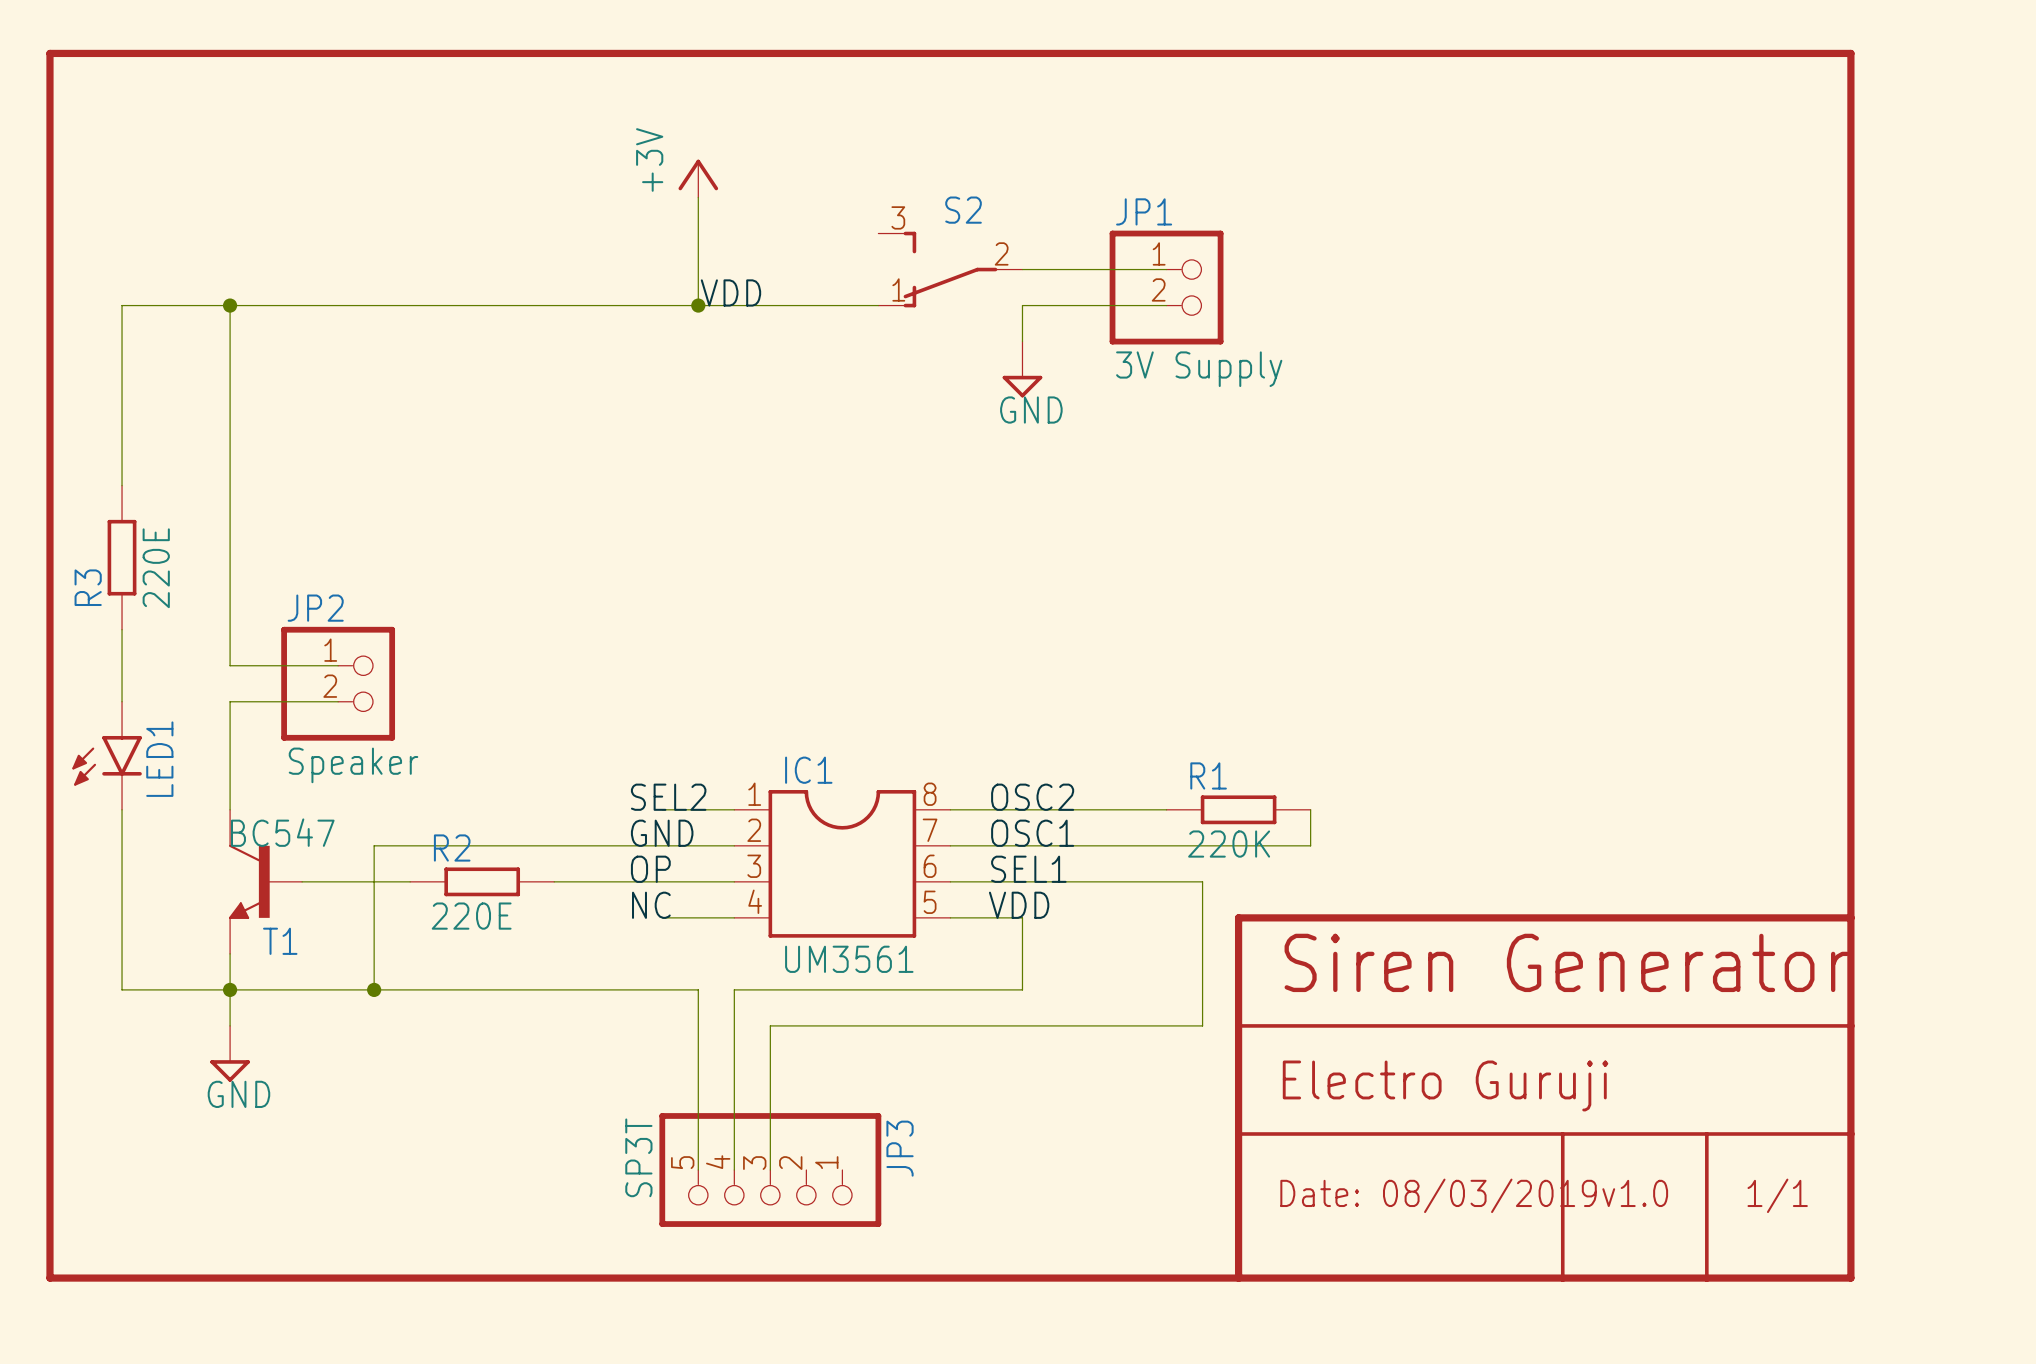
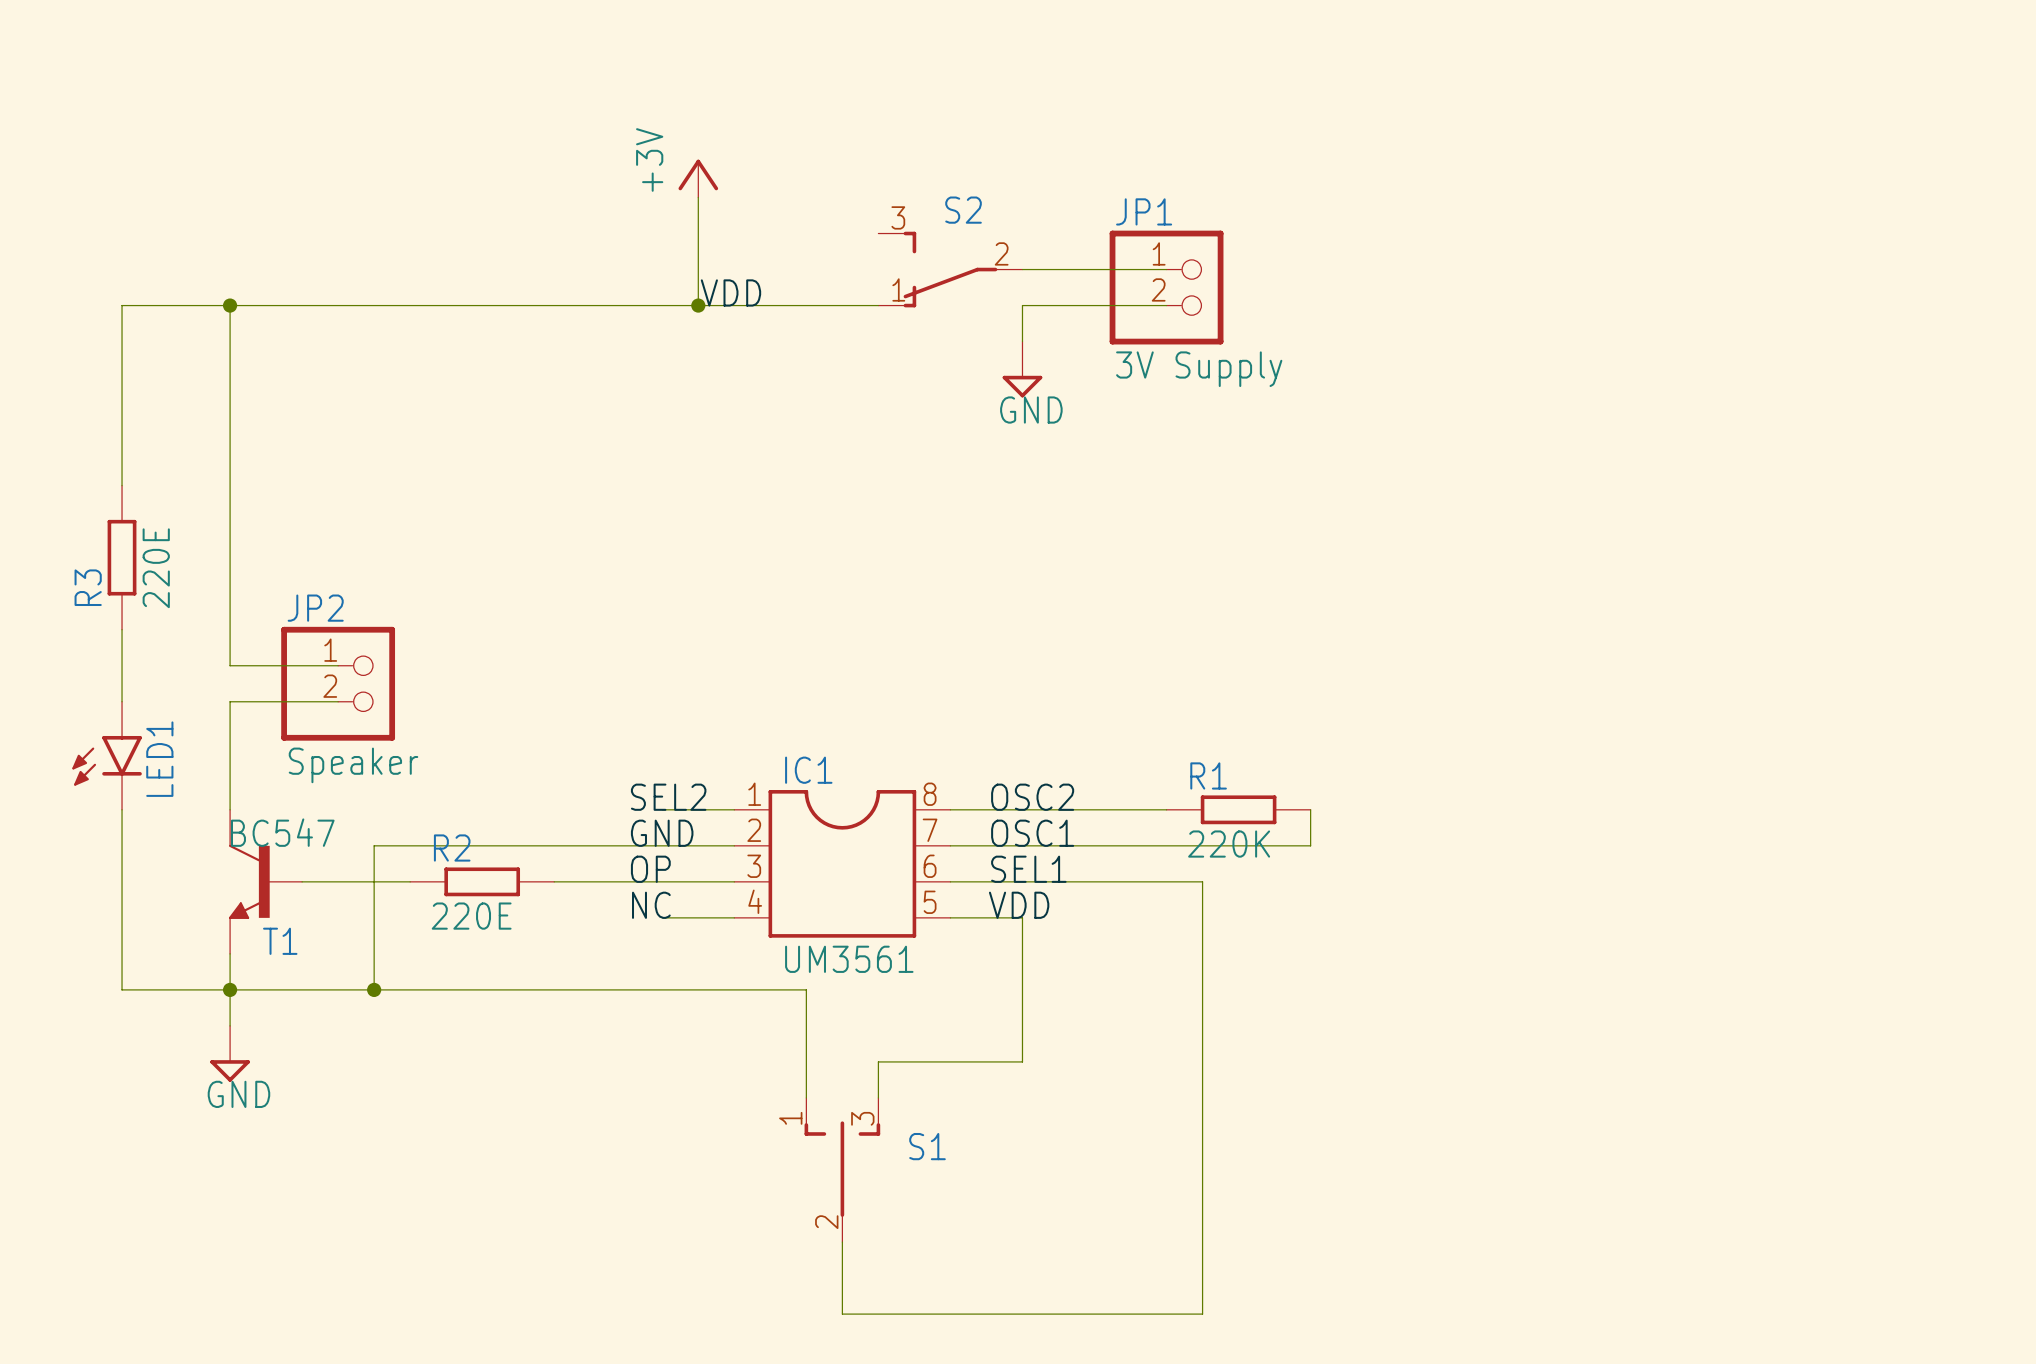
line: (49, 53) (49, 1278) (1850, 1278) (1850, 53) (49, 53) -> none
line: (1850, 917) (1238, 917) (1238, 1278) -> none
text: Siren Generator (1566, 962) -> none
wire: (698, 989) (698, 1170) -> (698, 989) (734, 989)
wire: (734, 989) (734, 1170) -> none
wire: (806, 989) (1022, 989) -> (878, 1097) (878, 1061) (1022, 1061) (1022, 989)
wire: none -> (806, 989) (806, 1097)
wire: (1202, 1025) (770, 1025) (770, 1170) -> (1202, 1025) (1202, 1314) (842, 1314) (842, 1242)
line: (1238, 1025) (1850, 1025) -> none
text: Electro Guruji (1445, 1085) -> none
line: (1238, 1133) (1850, 1133) -> none
line: (1562, 1133) (1562, 1278) -> none
line: (1706, 1133) (1706, 1278) -> none
JP3: SP3T (770, 1170) -> none
S1: none -> (842, 1170)
text: v1.0 (1635, 1193) -> none
text: Date: 08/03/2019 (1438, 1195) -> none
text: 1/1 (1777, 1195) -> none

